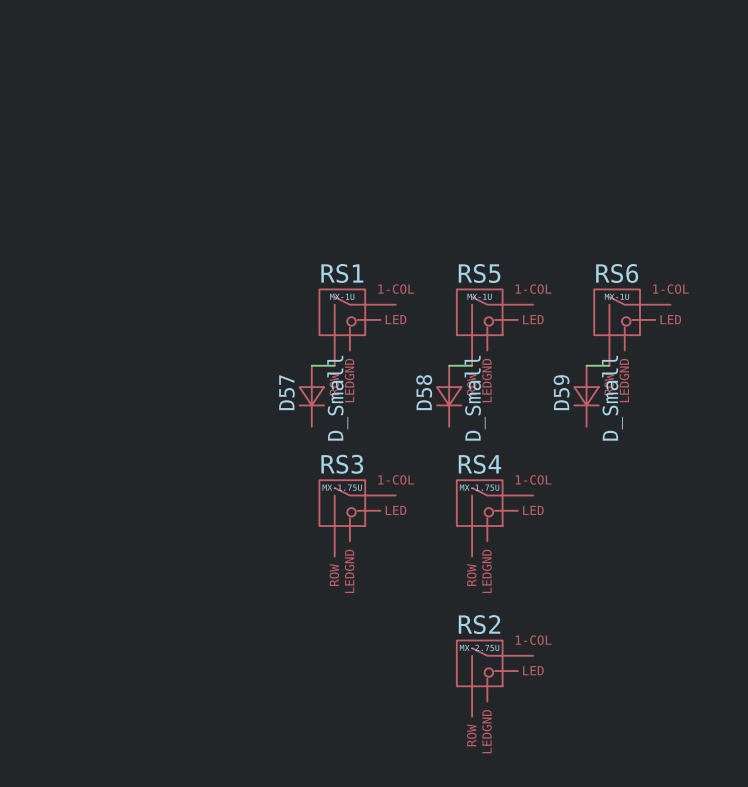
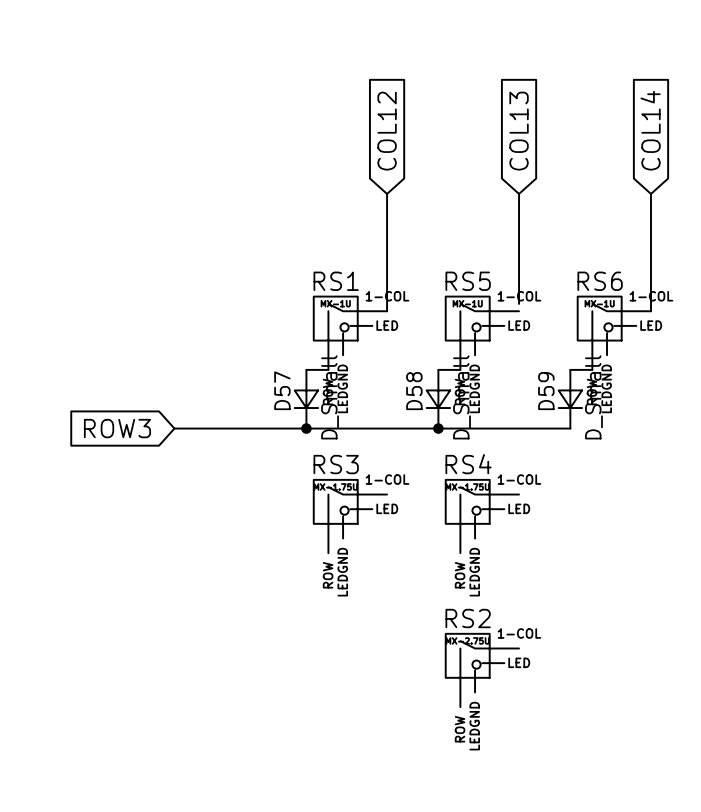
global label: none -> COL14 (650, 130)
global label: none -> COL12 (387, 131)
global label: none -> COL13 (519, 131)
wire: none -> (387, 193) (387, 311)
wire: none -> (519, 193) (519, 303)
wire: none -> (651, 193) (651, 311)
global label: none -> ROW3 (117, 428)
wire: none -> (174, 428) (570, 428)
junction: none -> (306, 428)
junction: none -> (438, 428)

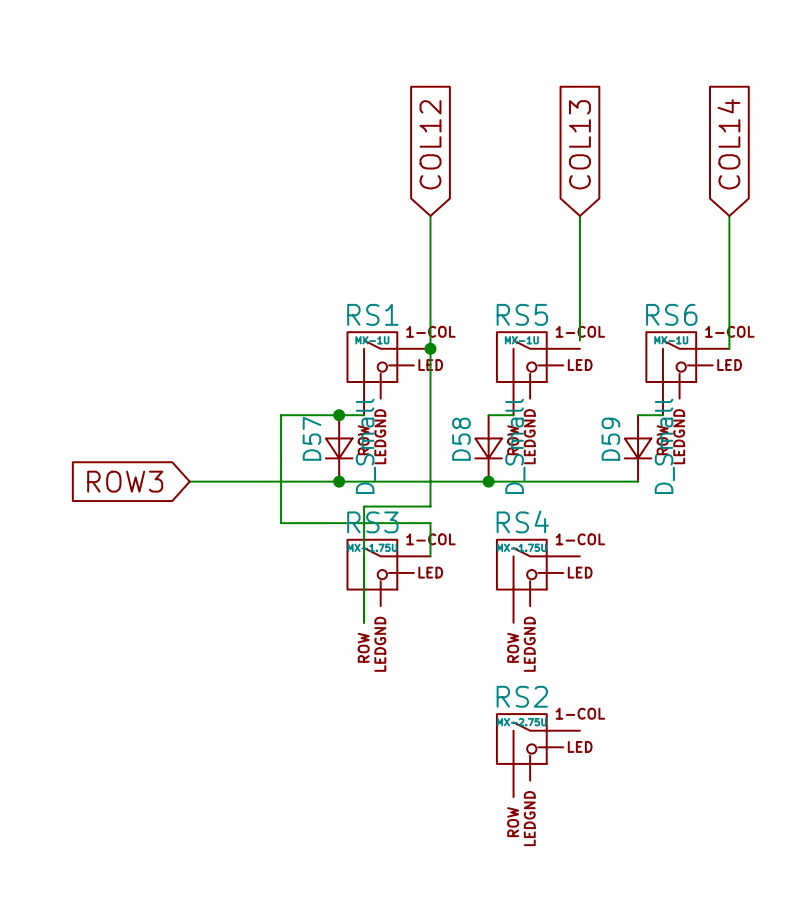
wire: none -> (430, 348) (430, 506) (364, 506) (364, 622)
junction: none -> (430, 348)
wire: none -> (339, 415) (281, 415) (281, 523) (430, 523) (430, 556)
junction: none -> (339, 415)

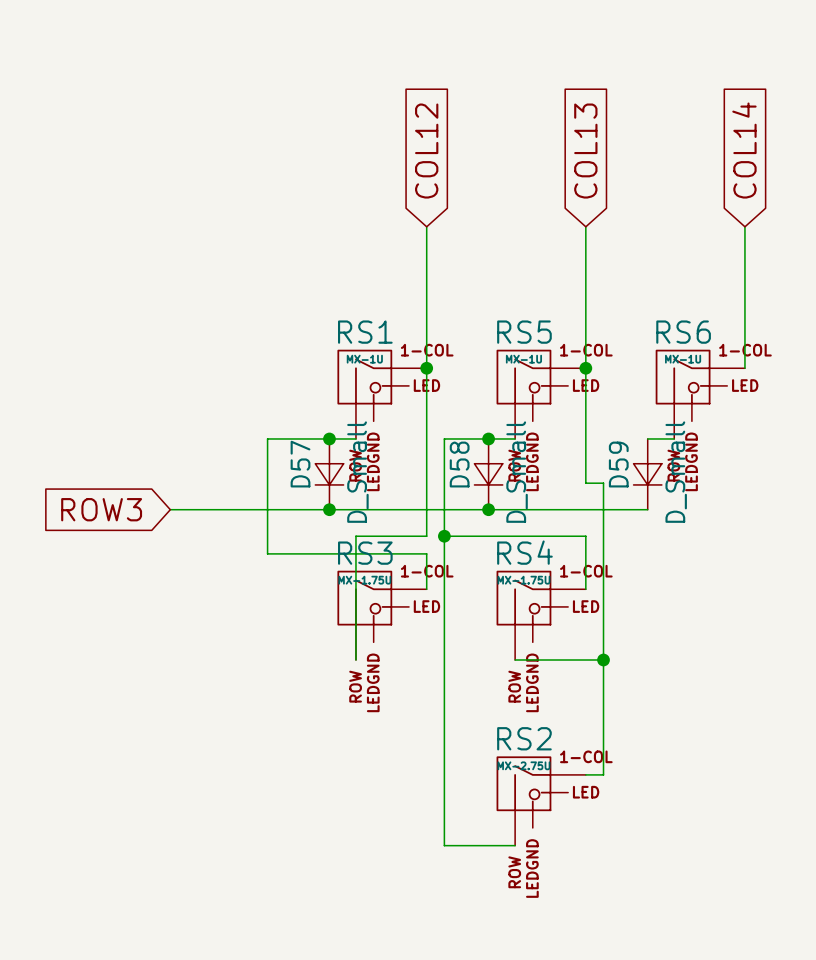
wire: none -> (585, 359) (585, 483) (603, 483) (603, 774) (585, 774)
junction: none -> (585, 368)
wire: none -> (488, 438) (444, 438) (444, 845) (515, 845)
junction: none -> (488, 438)
wire: none -> (444, 536) (585, 536) (585, 589)
junction: none -> (444, 536)
wire: none -> (515, 660) (603, 660)
junction: none -> (603, 660)

